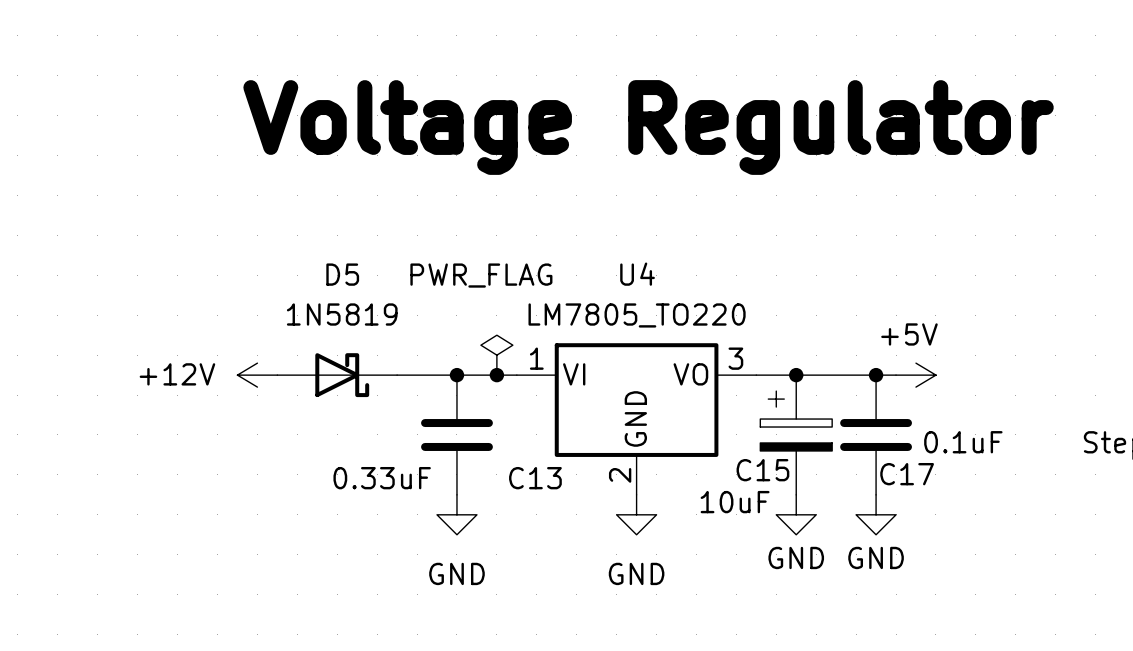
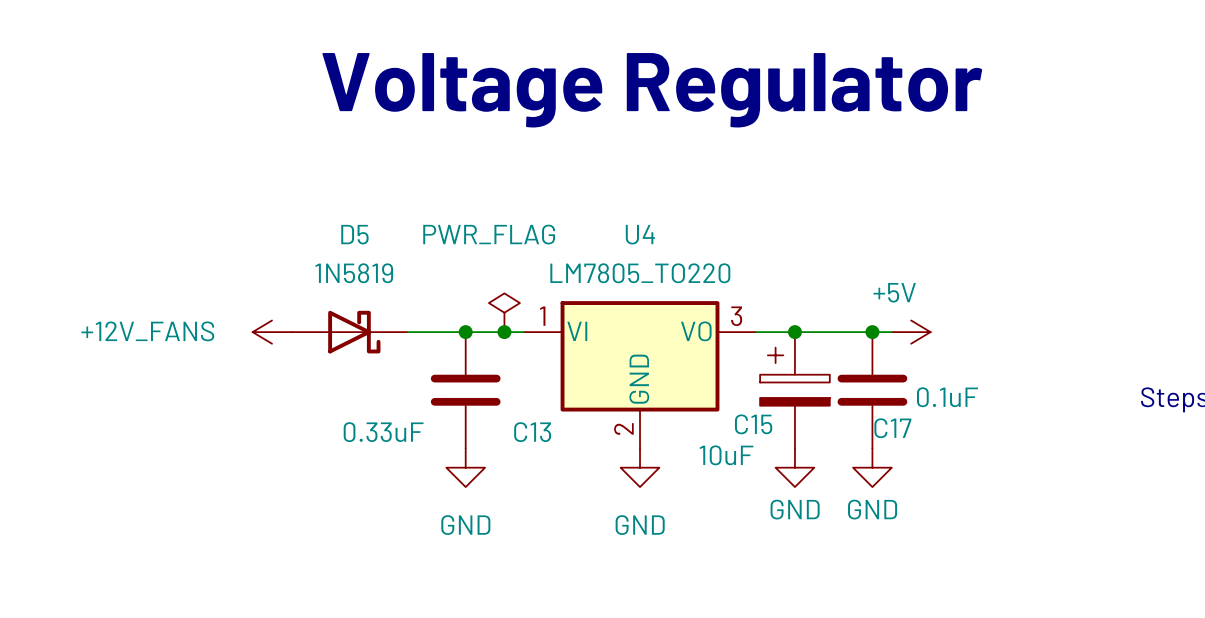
power symbol: +12V (257, 375) -> +12V_FANS (272, 332)

